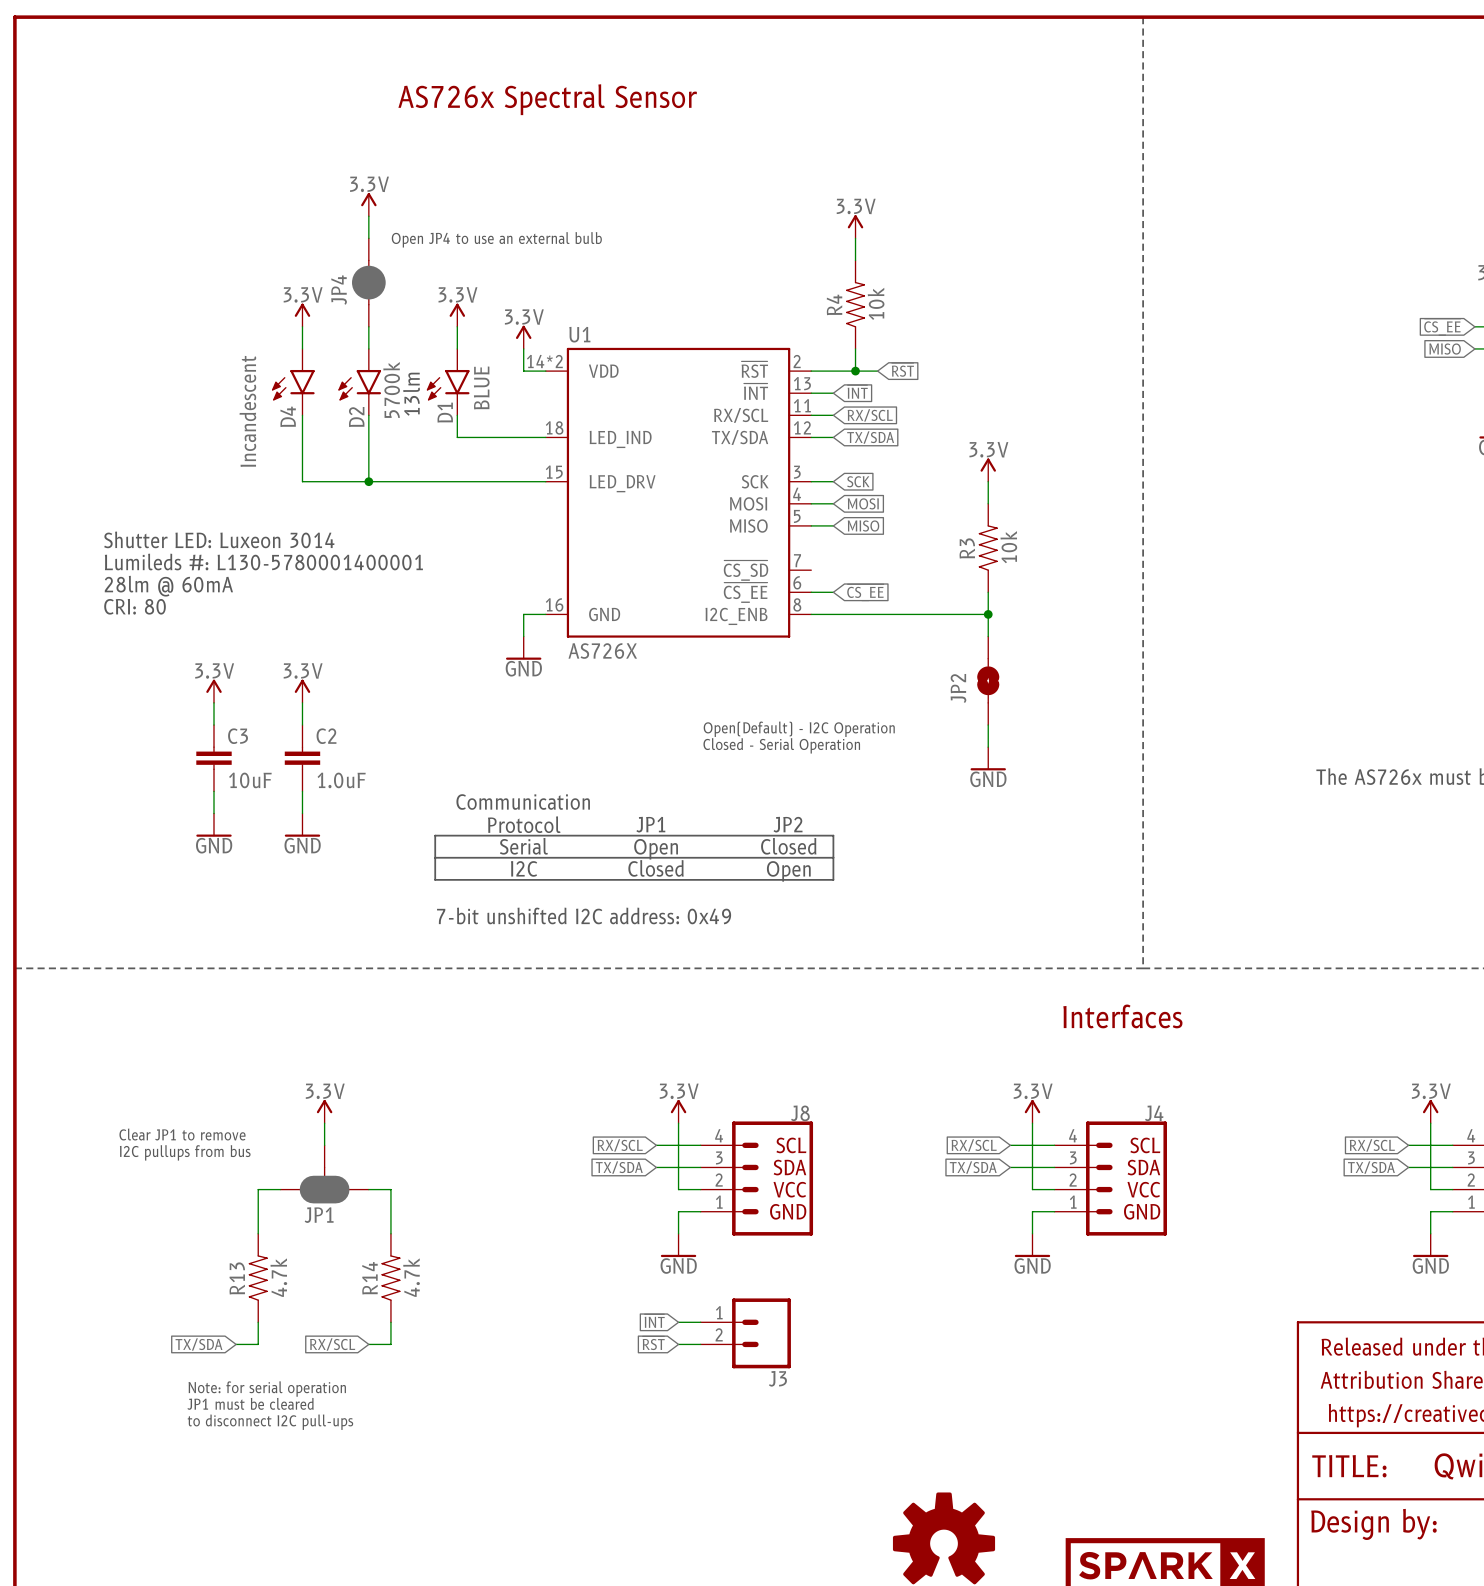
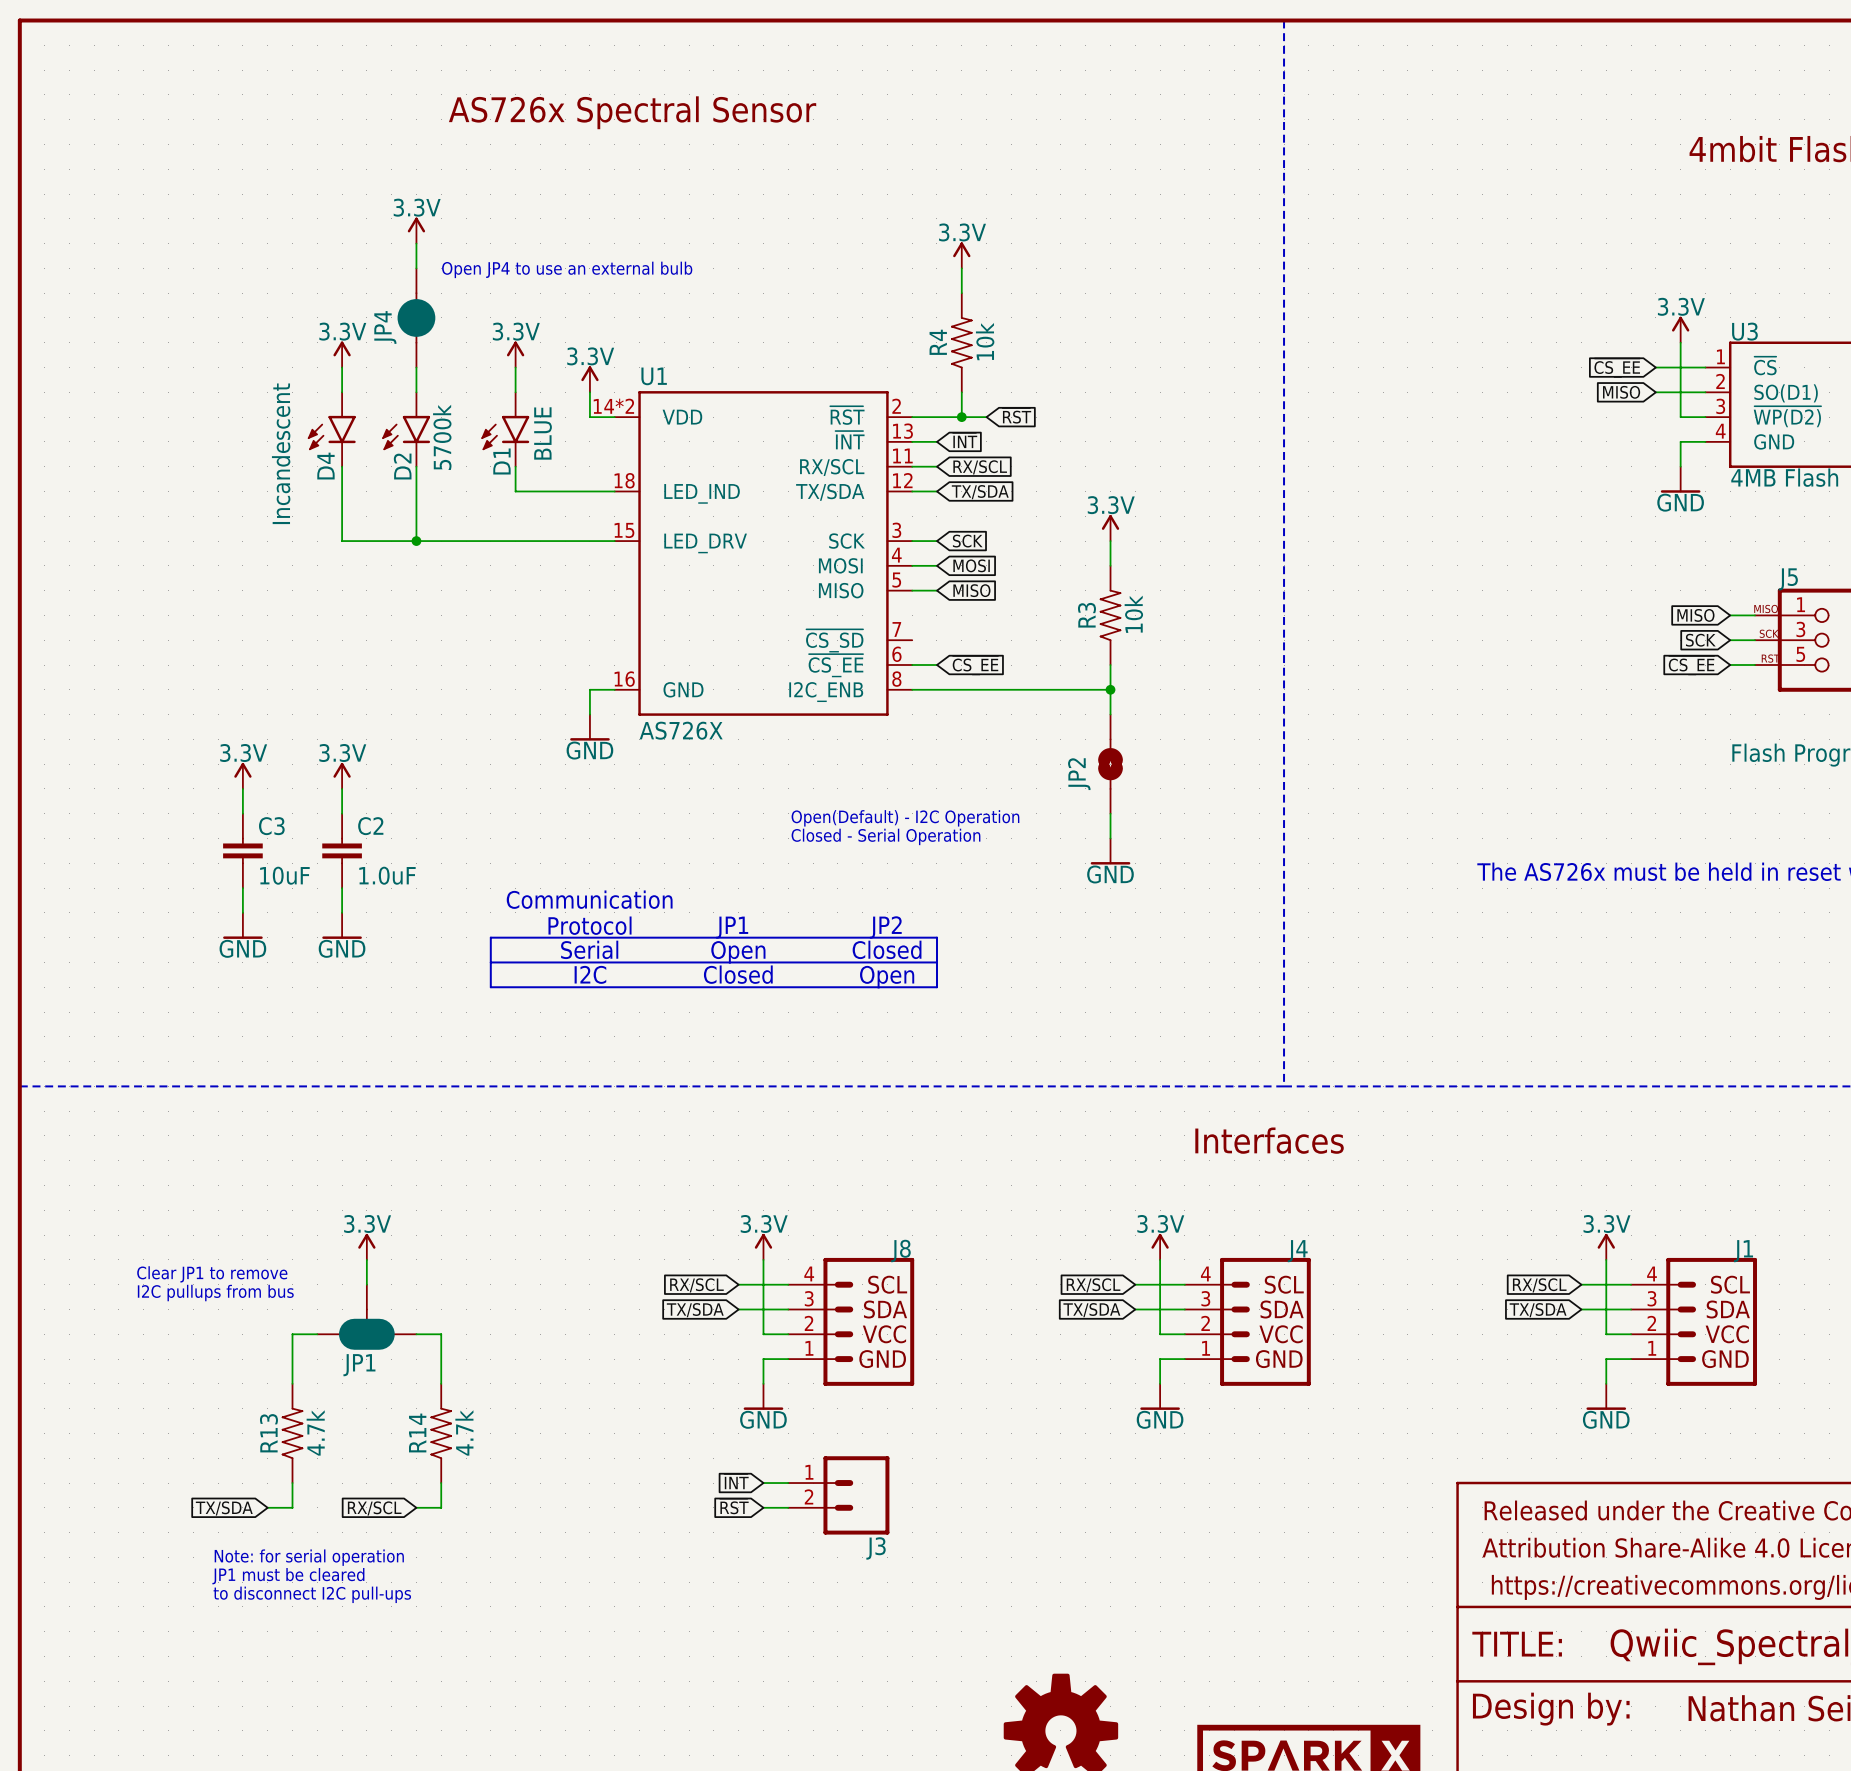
text: 13lm (411, 394) -> none
text: Shutter LED: Luxeon 3014 (219, 539) -> none
text: Lumileds #: L130-5780001400001 (263, 562) -> none
text: 28lm @ 60mA (168, 586) -> none
text: CRI: 80 (135, 606) -> none
text: 7-bit unshifted I2C address: 0x49 (584, 915) -> none

